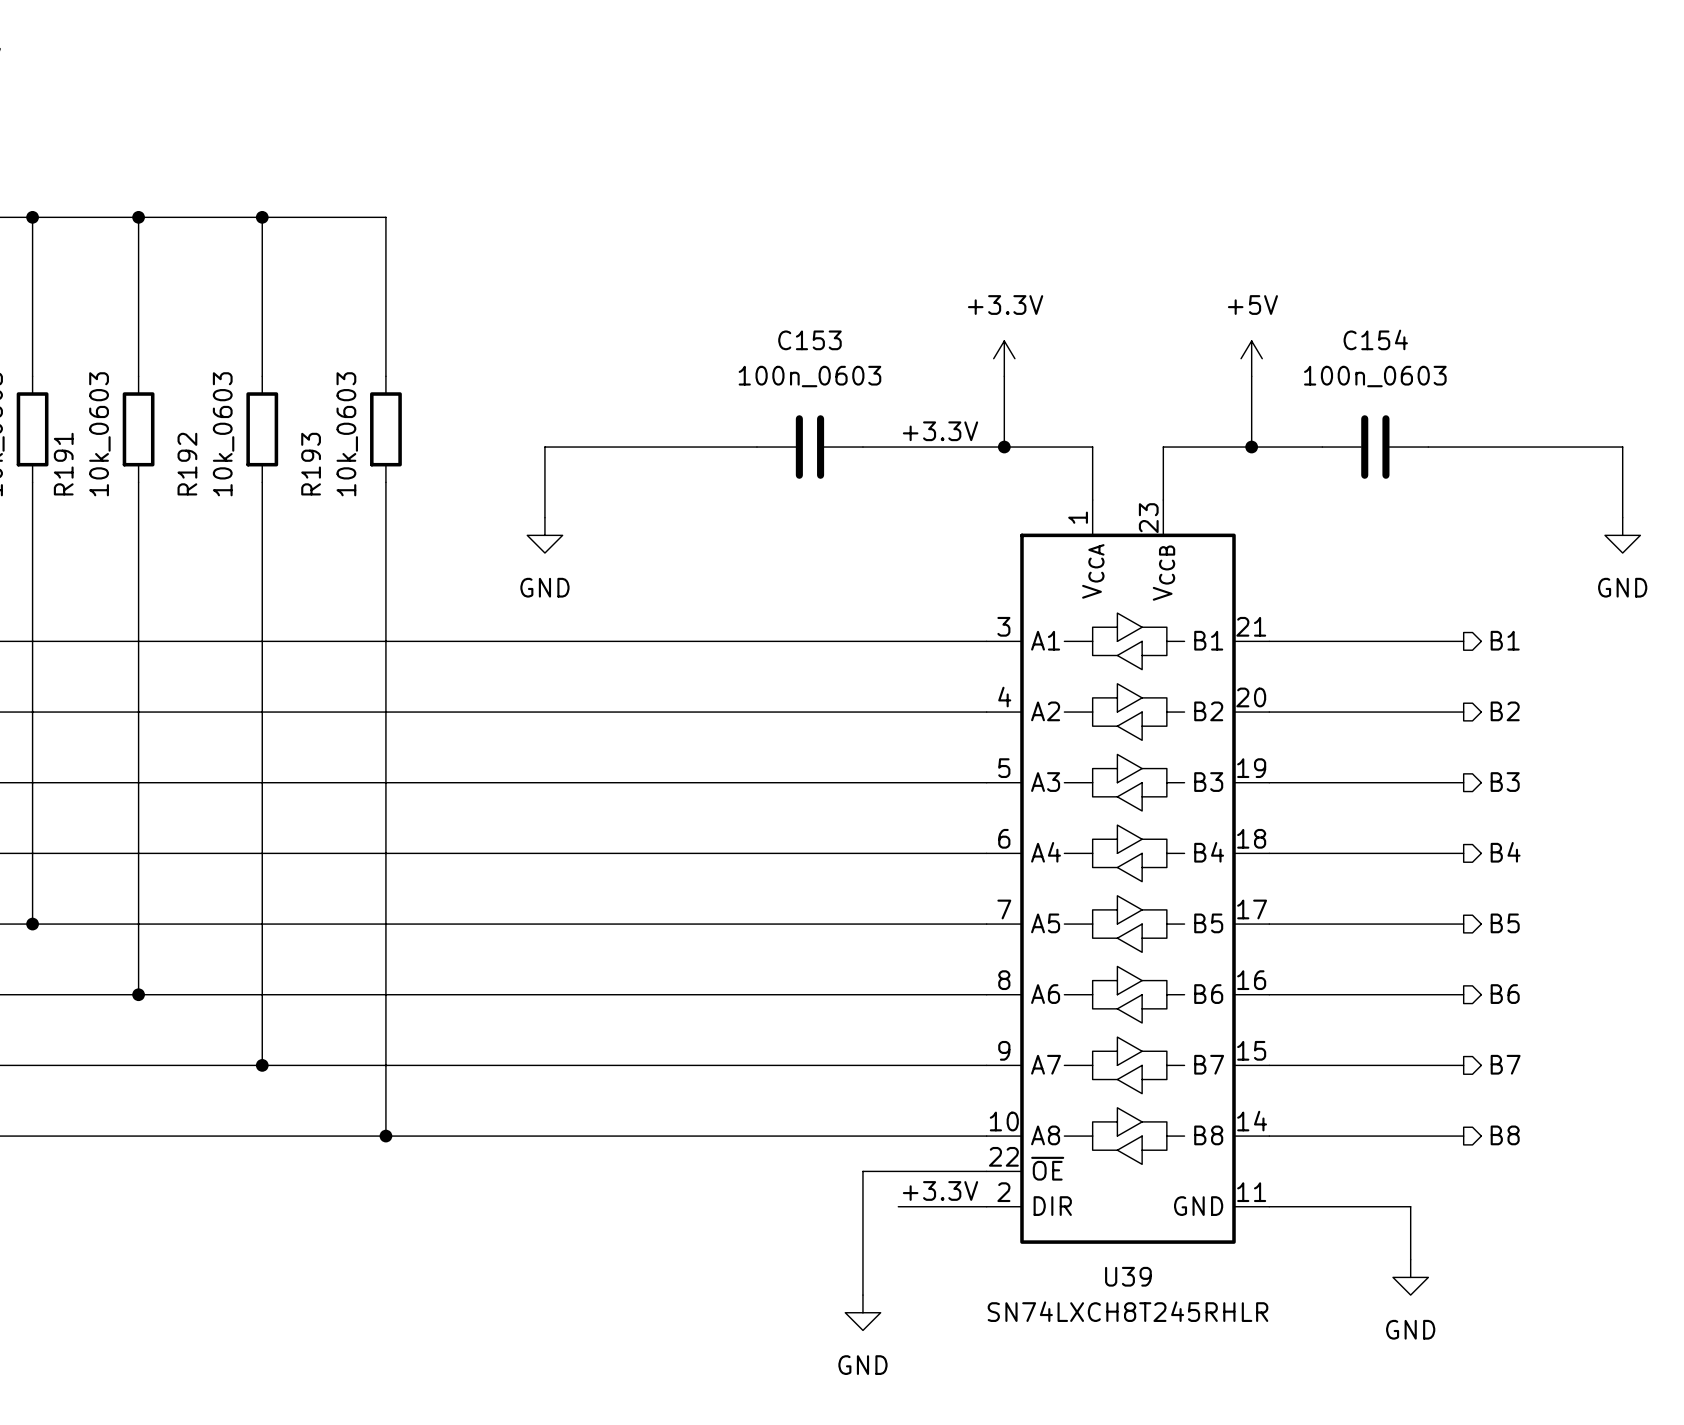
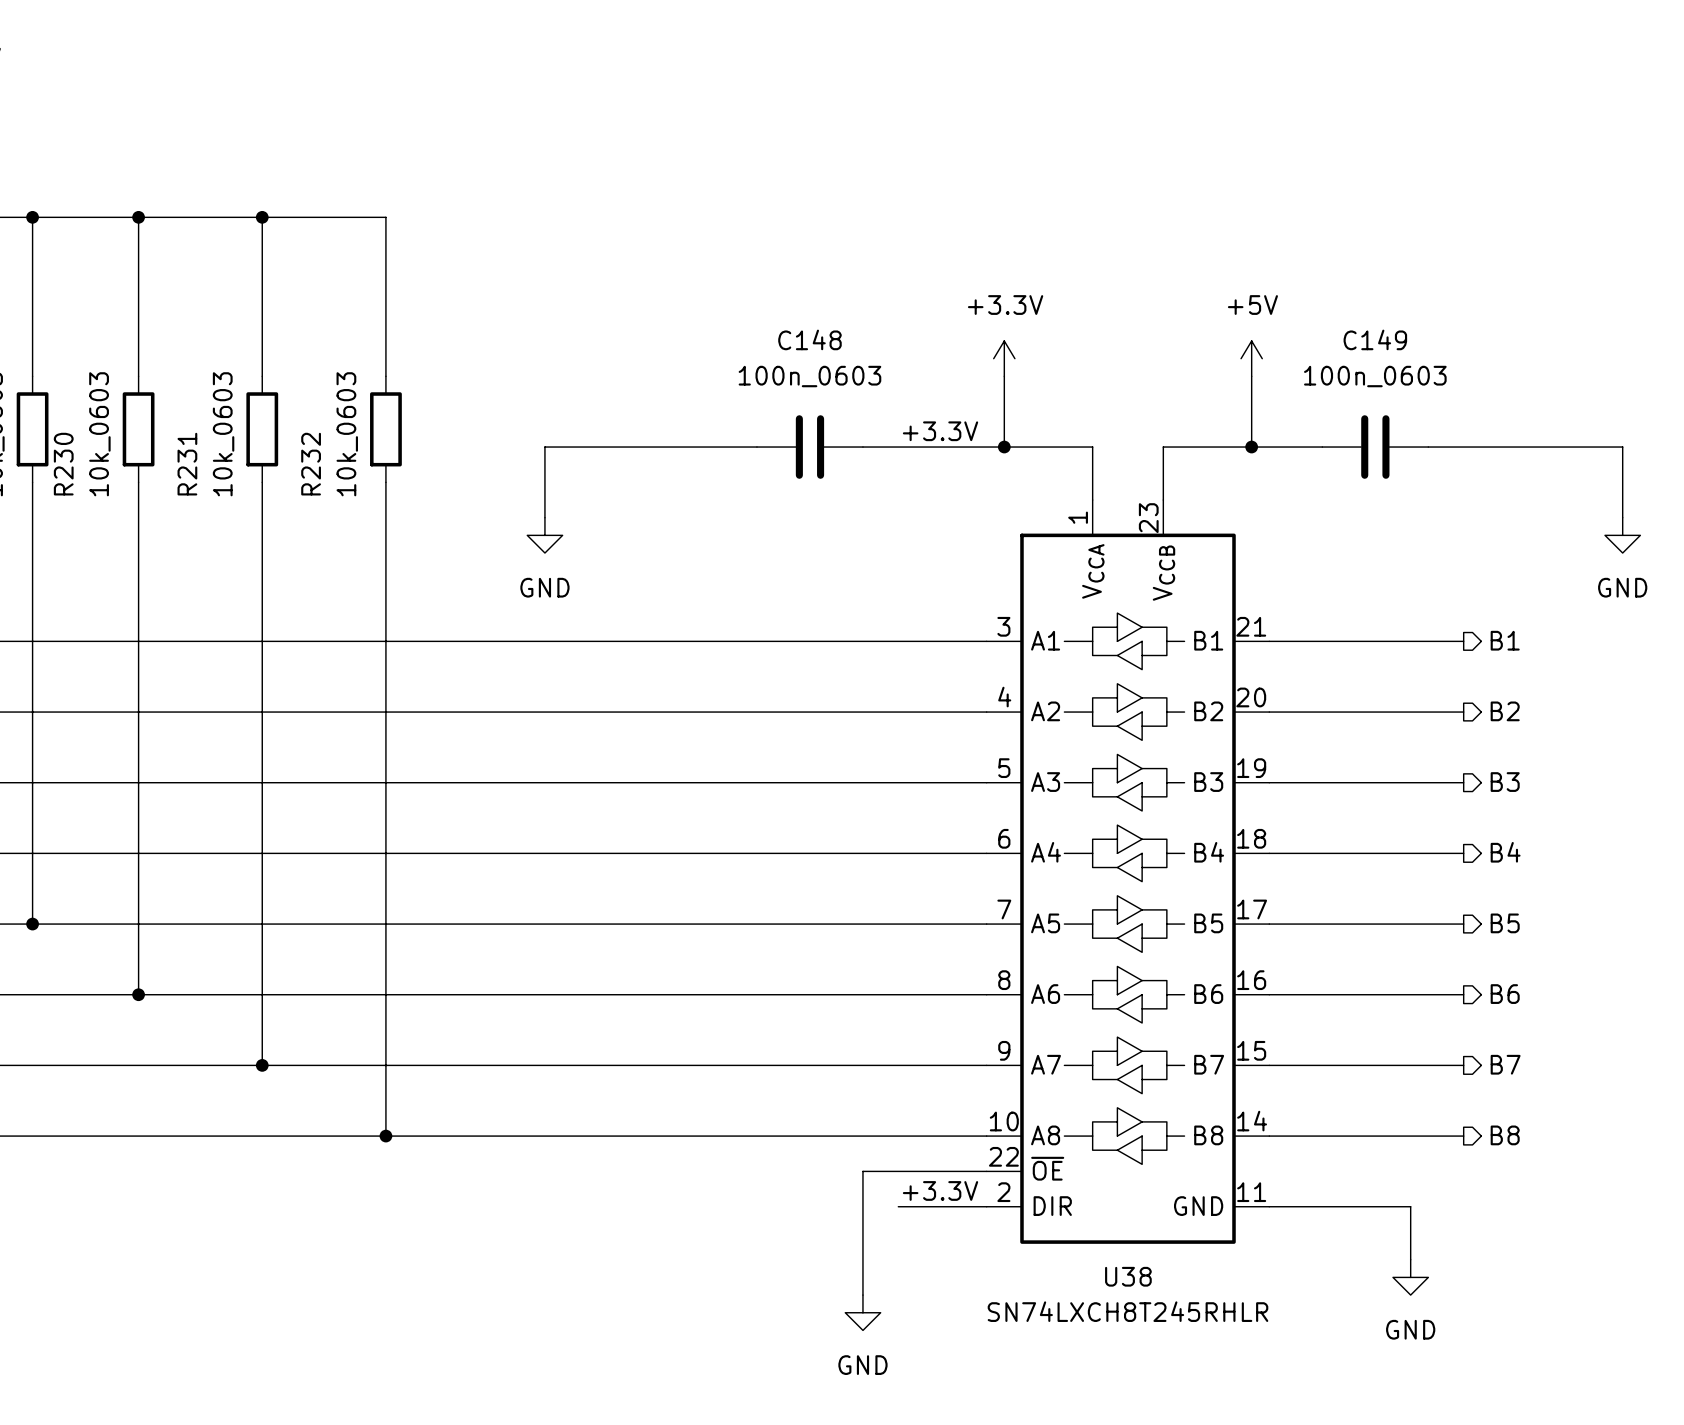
C154 name: C154 (1375, 339) -> C149 (1375, 339)
C153 name: C153 (809, 340) -> C148 (809, 339)
R191 name: R191 (63, 464) -> R230 (63, 464)
R192 name: R192 (187, 464) -> R231 (187, 464)
R193 name: R193 (311, 464) -> R232 (311, 464)
U39 name: U39 (1128, 1276) -> U38 (1128, 1276)

